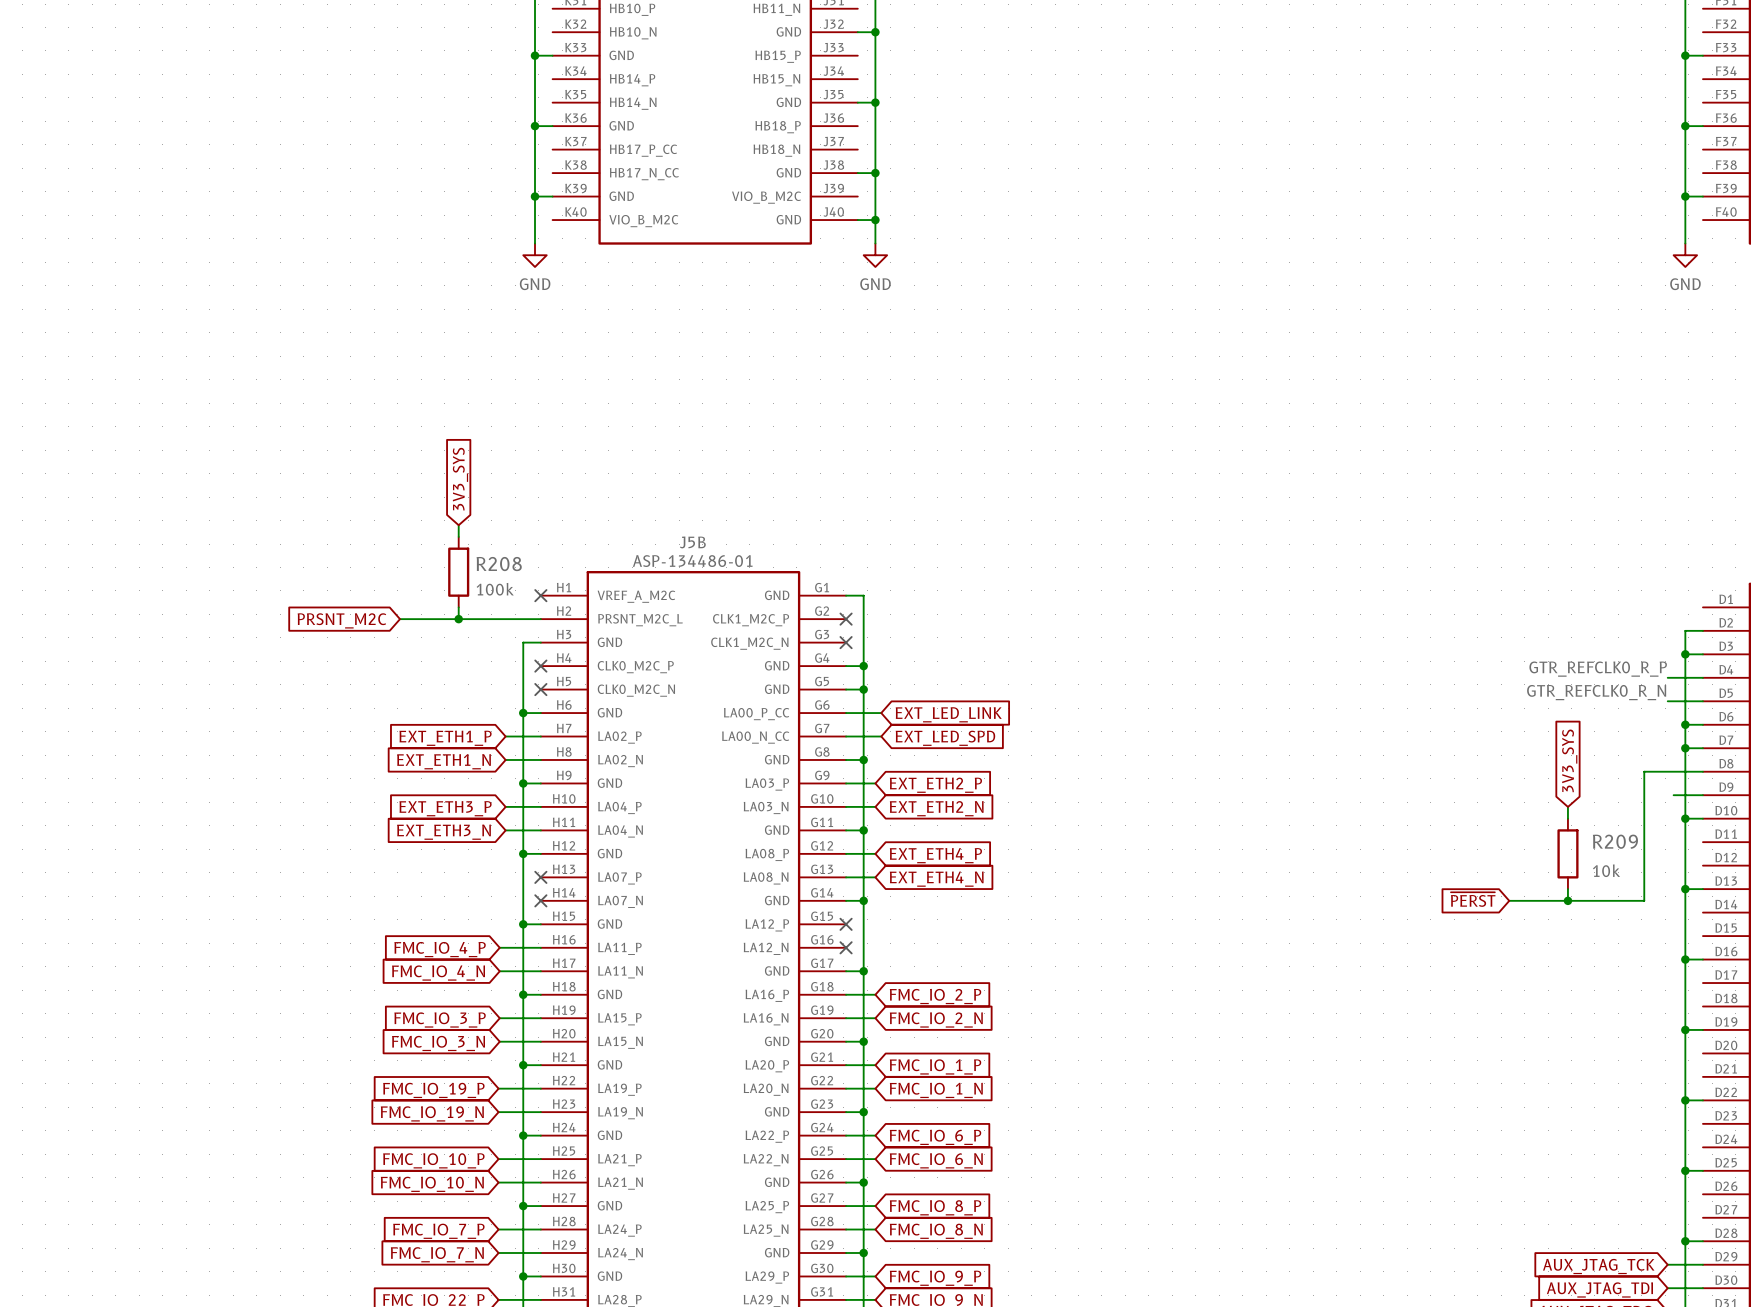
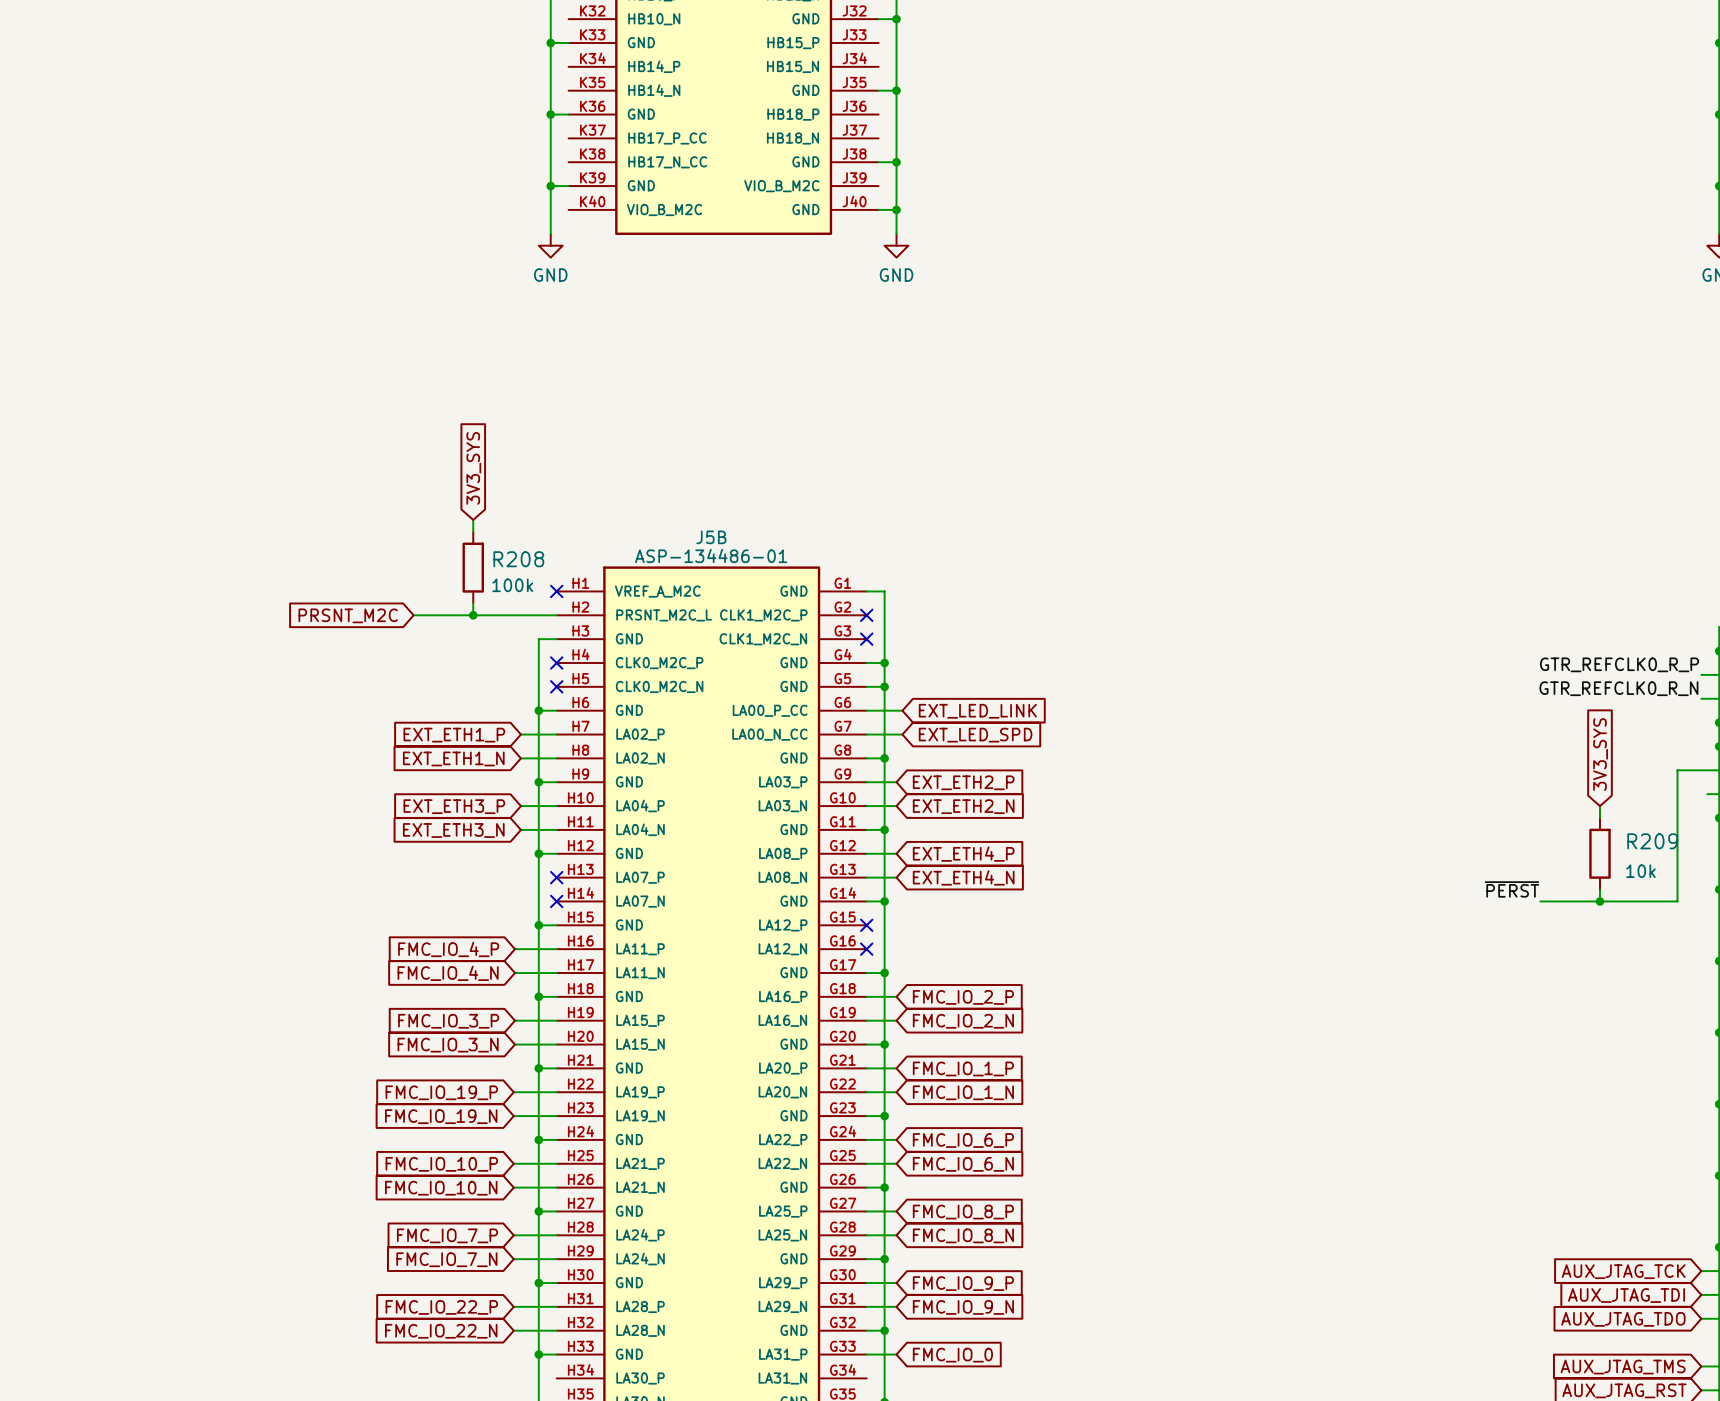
label: none -> ~{PERST} (1511, 889)
global label: ~{PERST} (1473, 899) -> none

